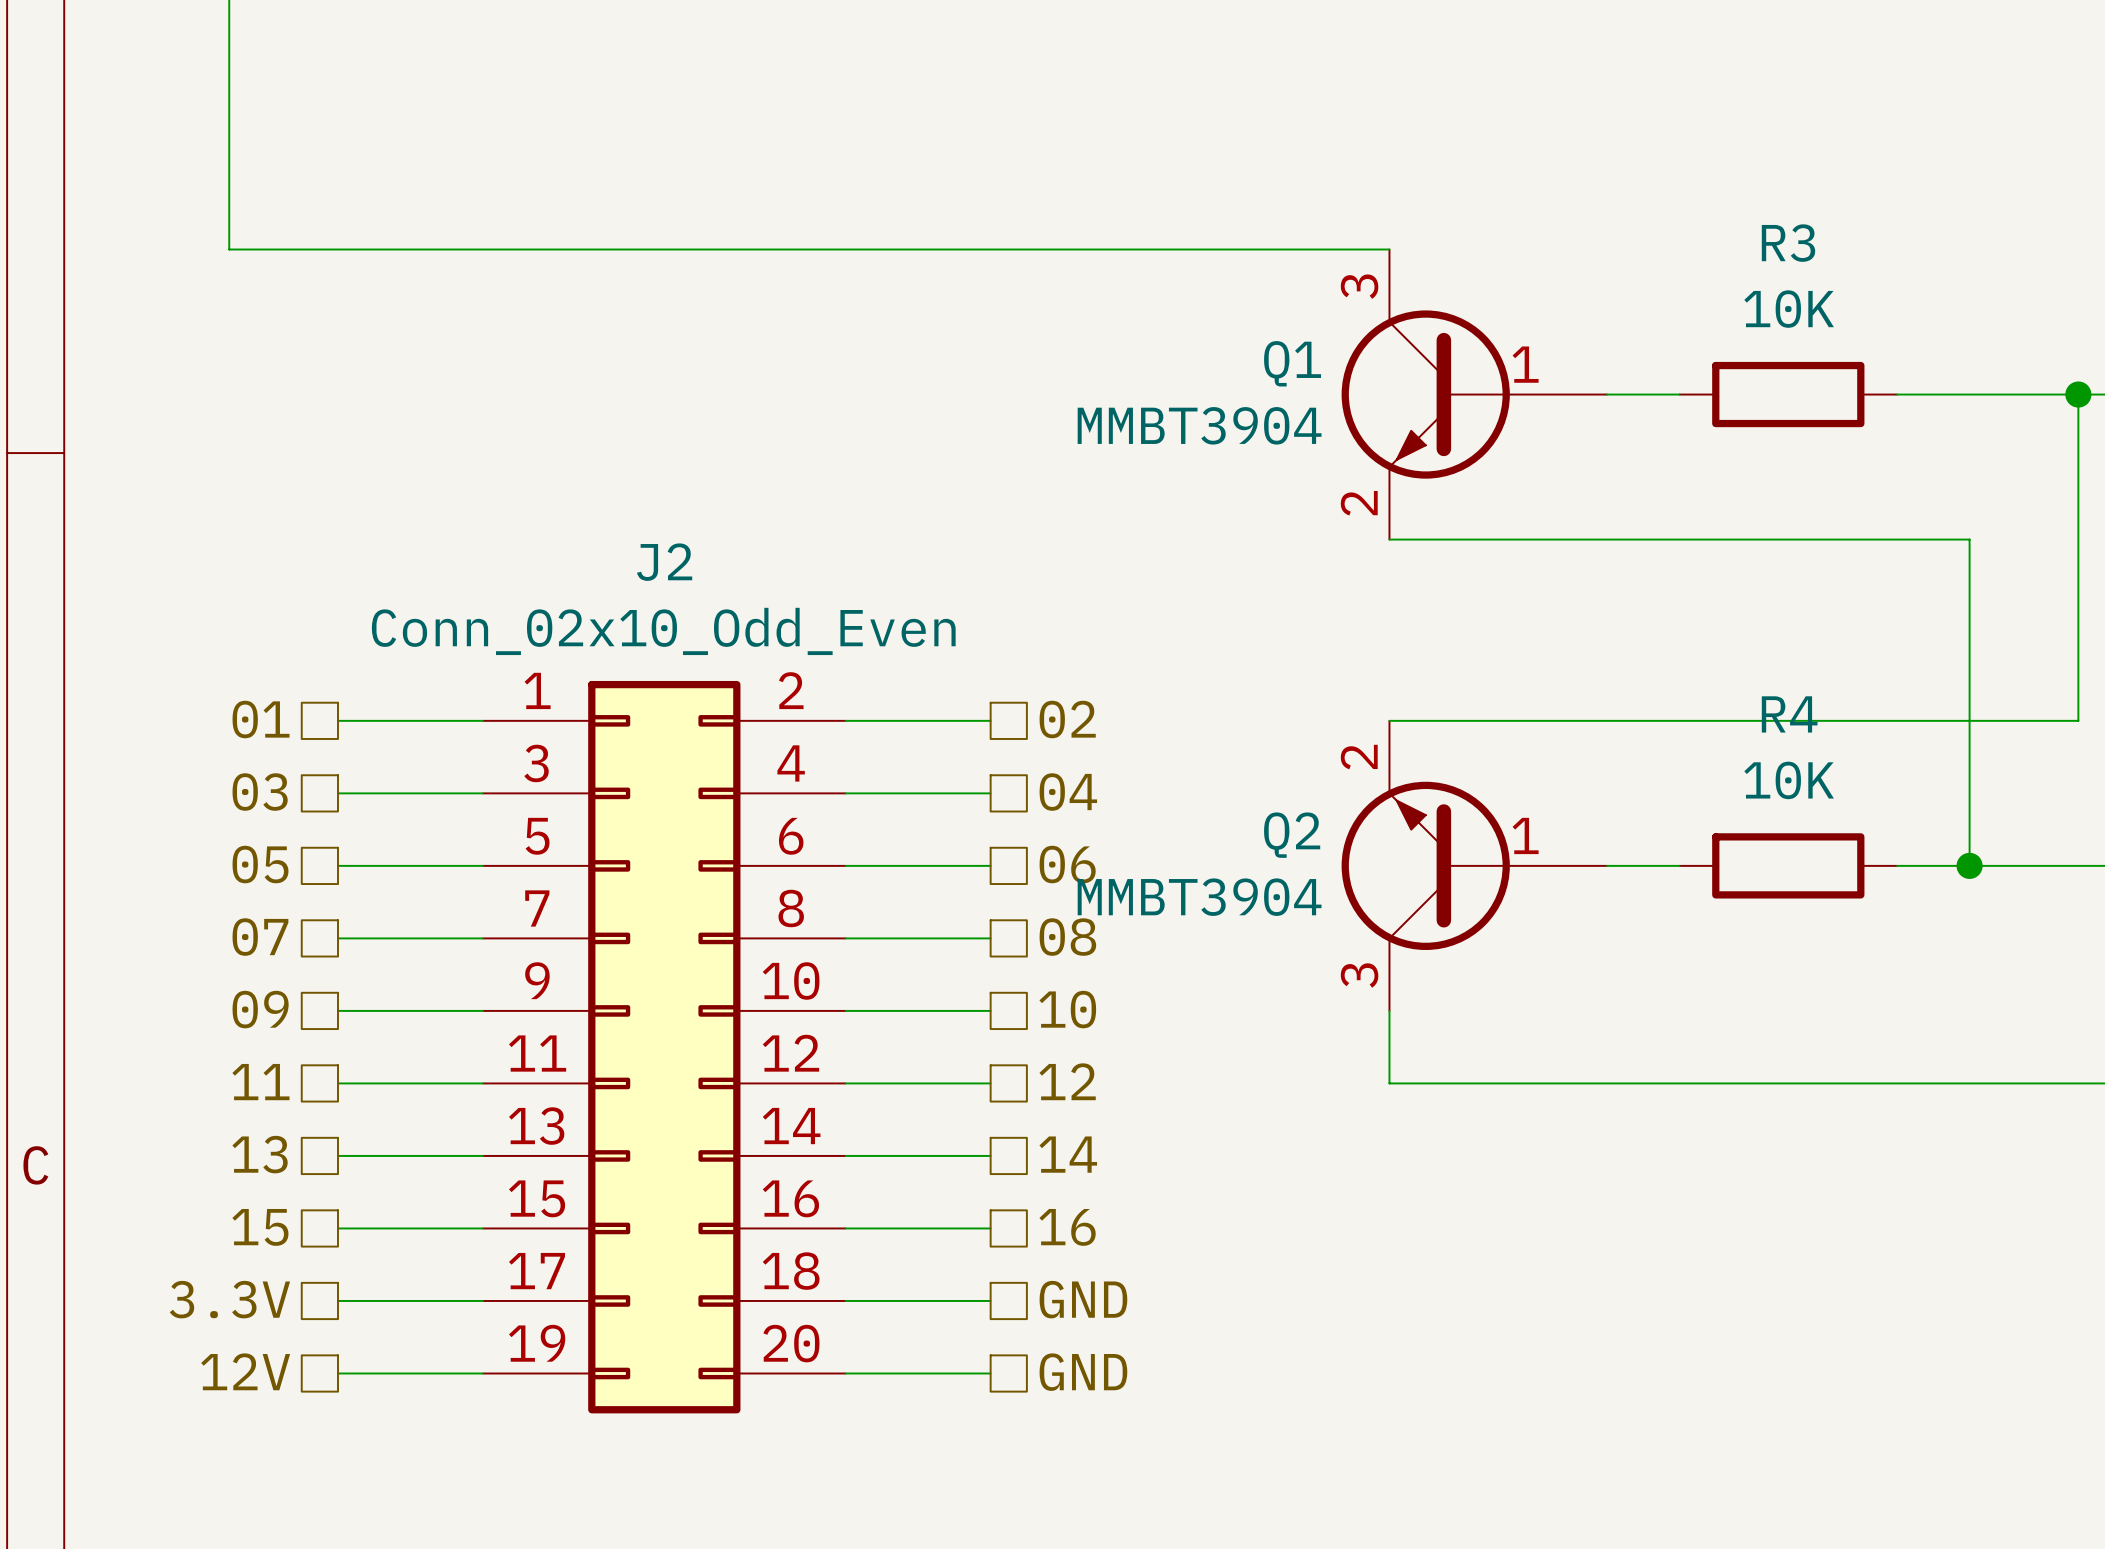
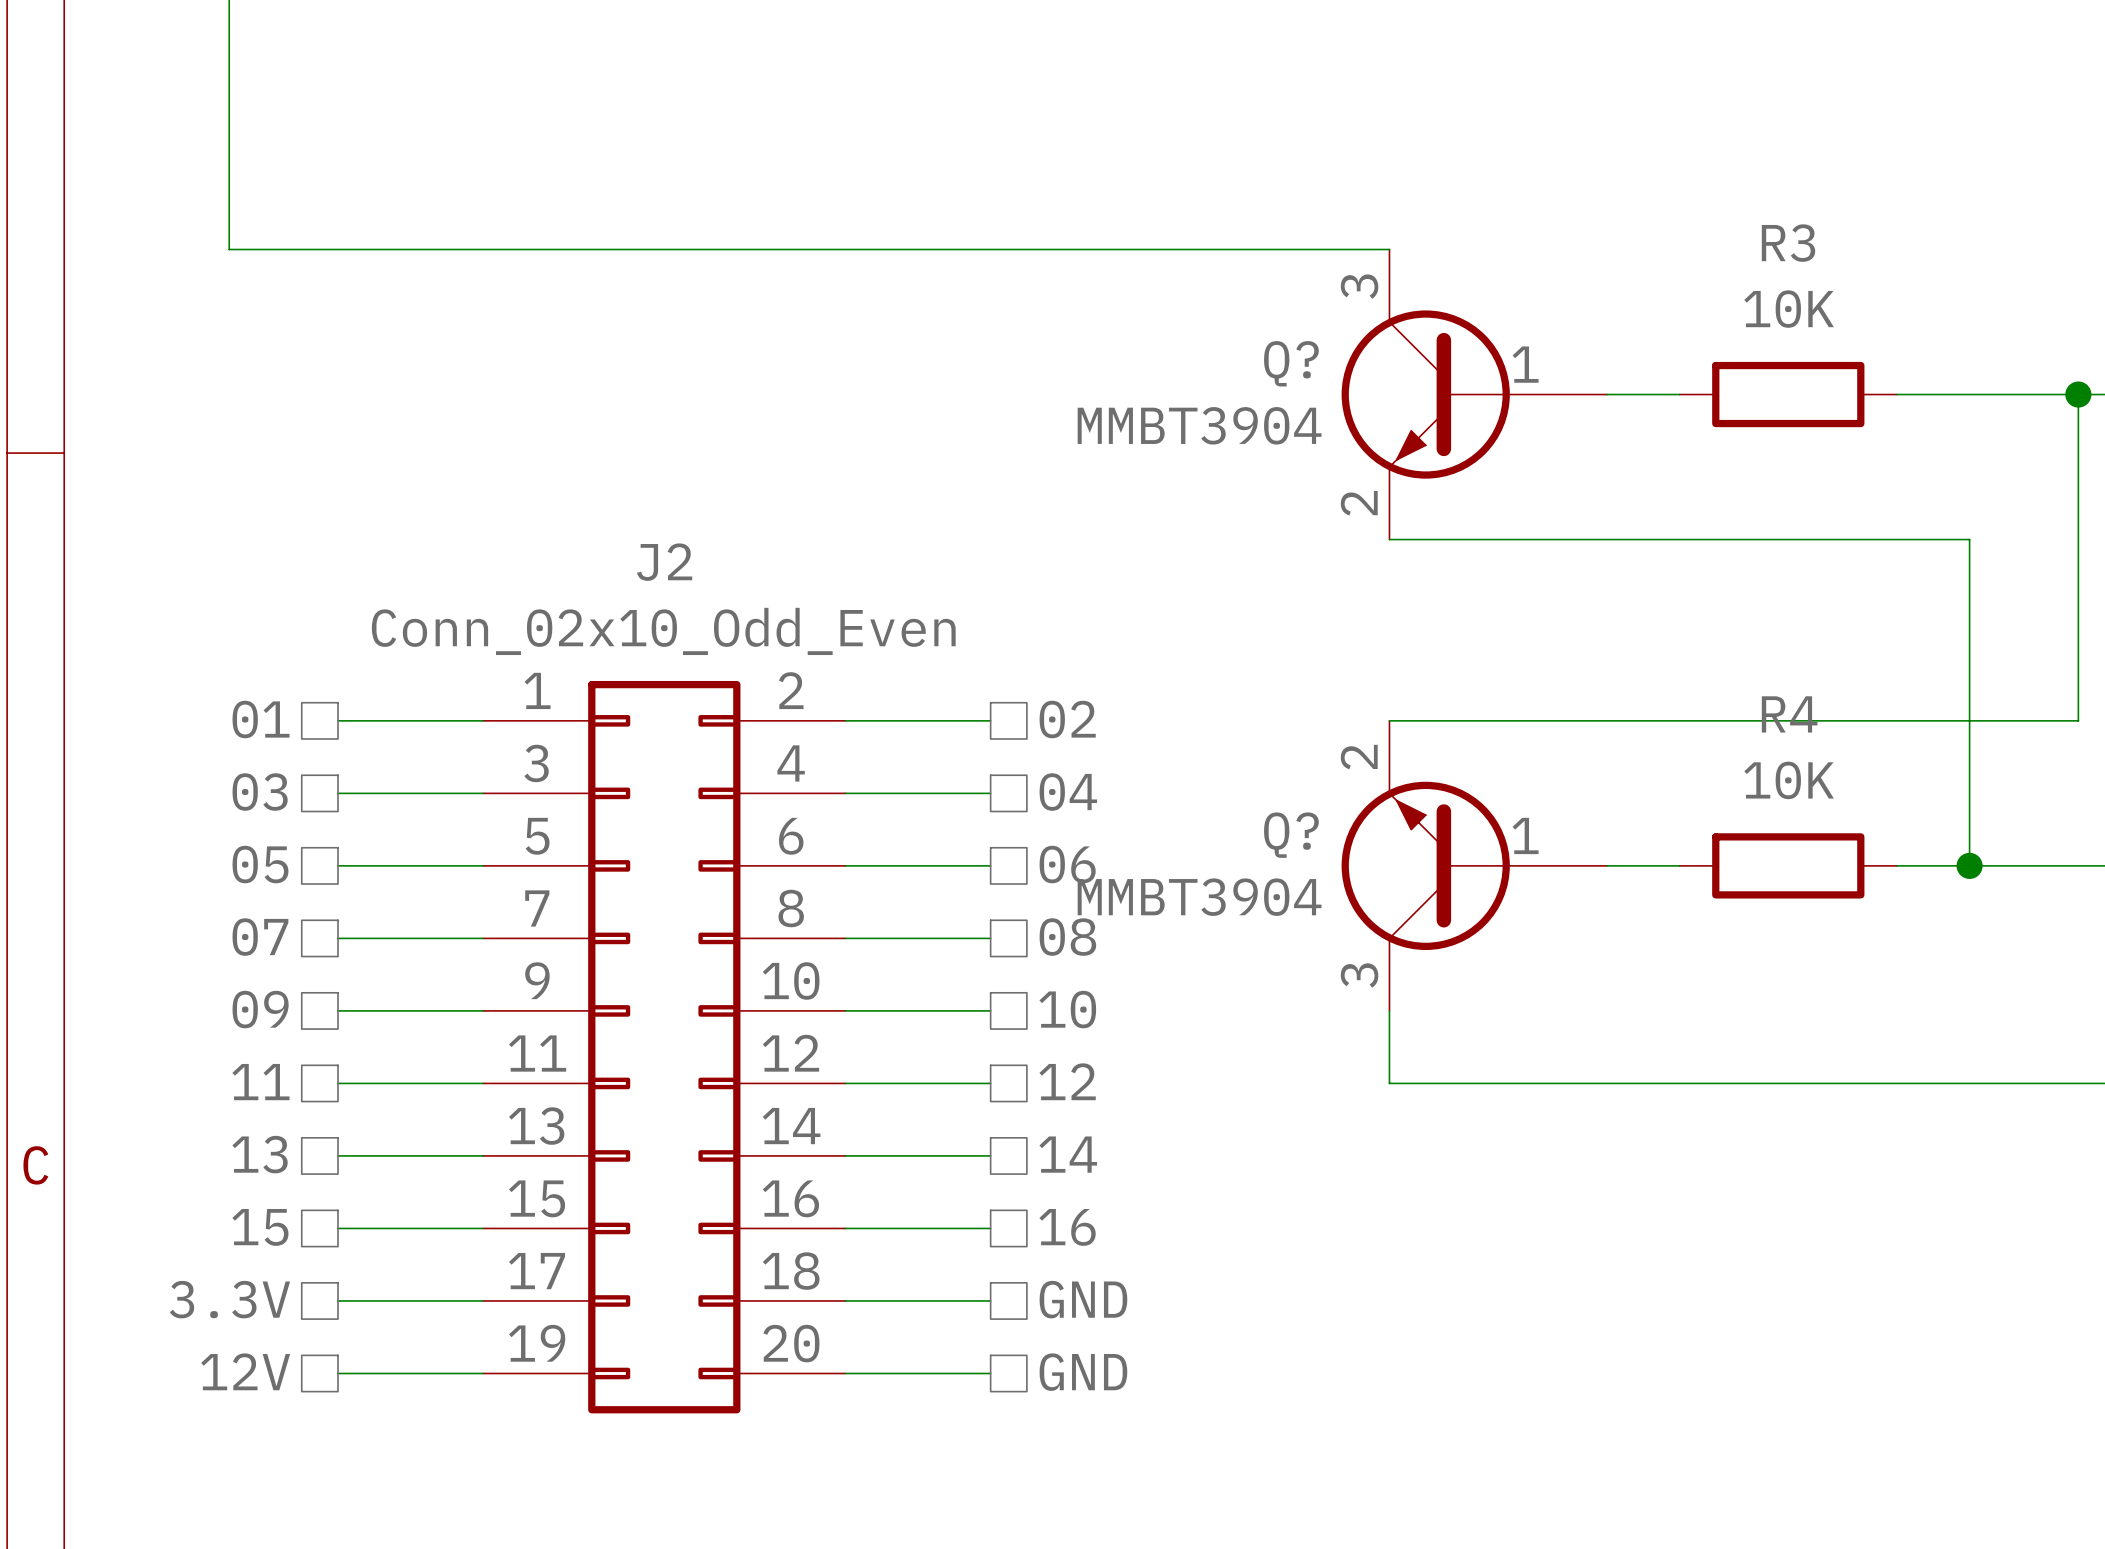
Q1 name: Q1 (1292, 363) -> Q? (1291, 363)
Q2 name: Q2 (1292, 835) -> Q? (1291, 835)

